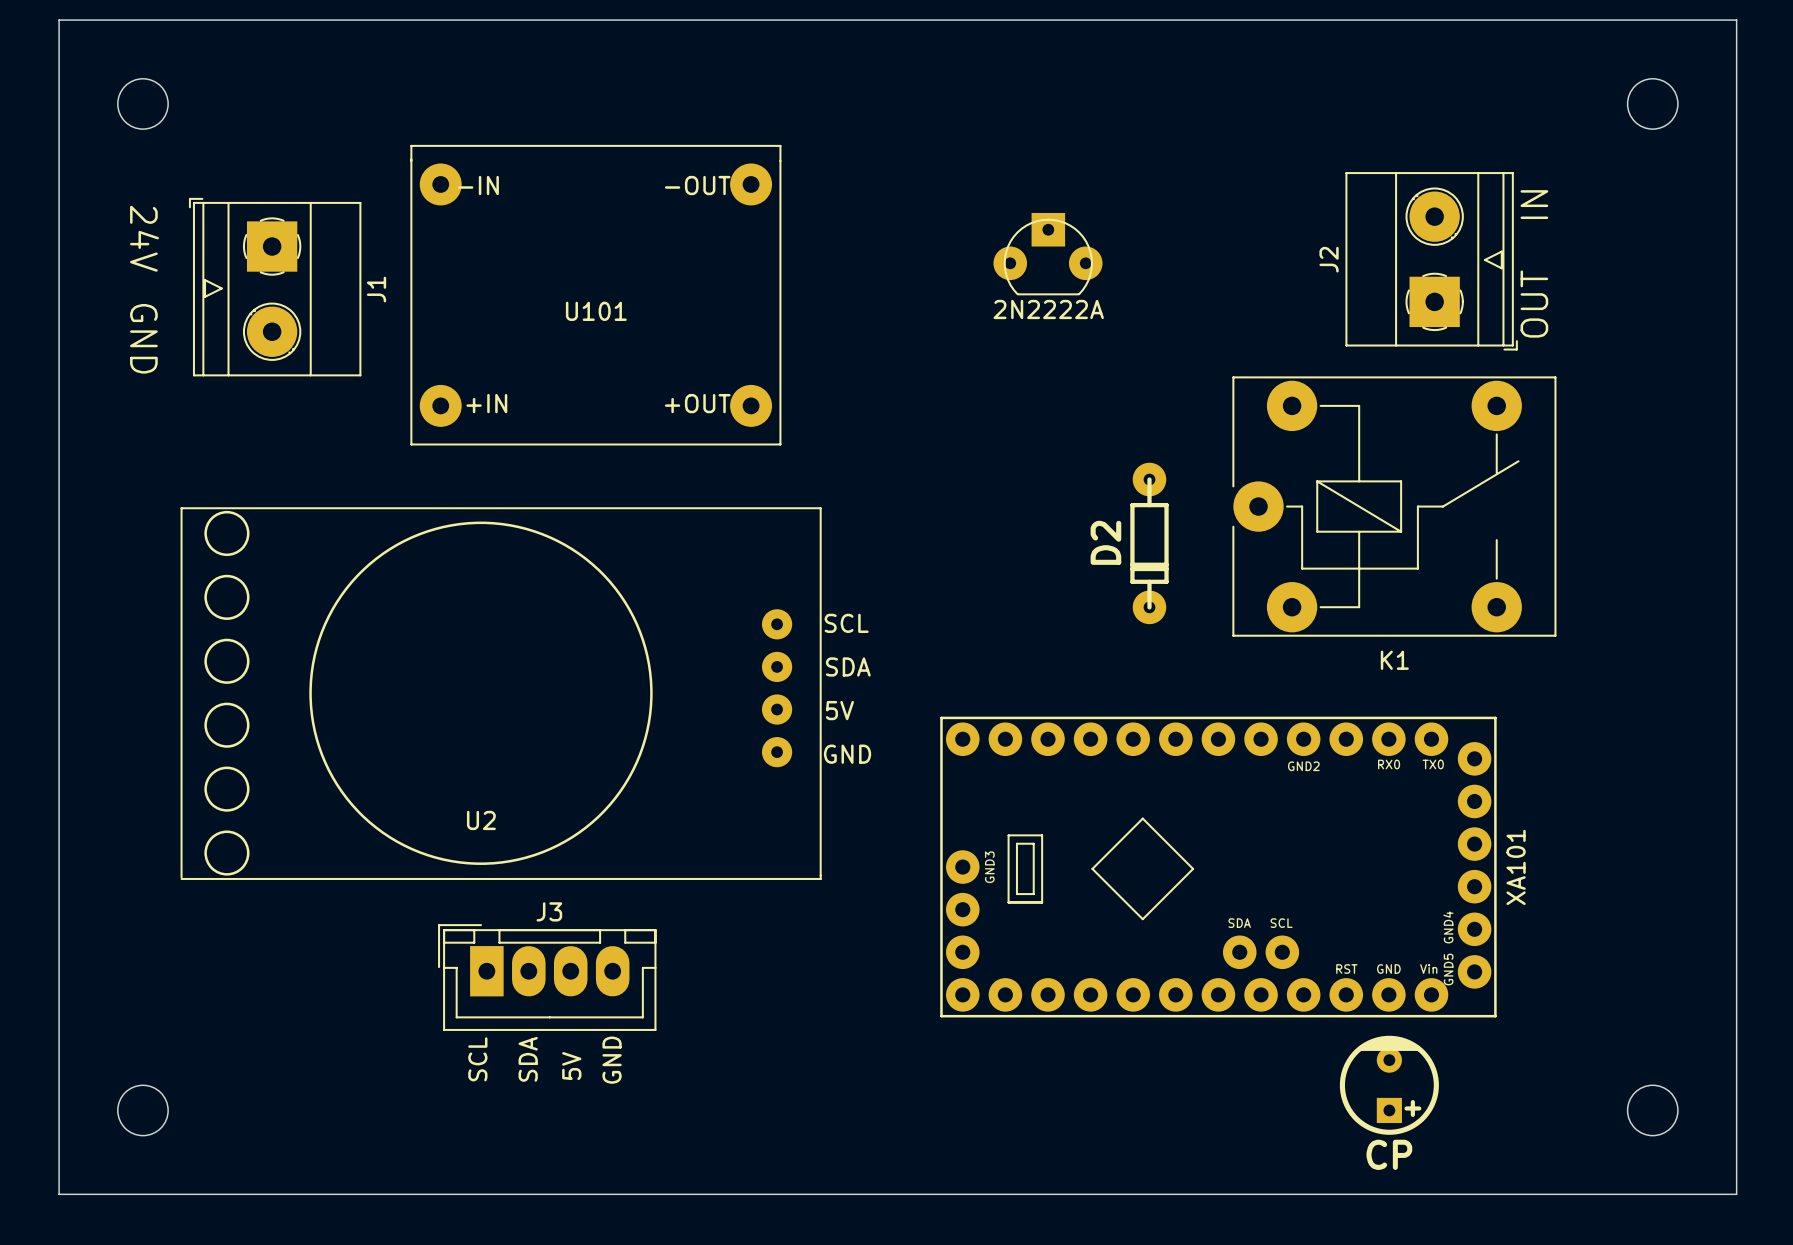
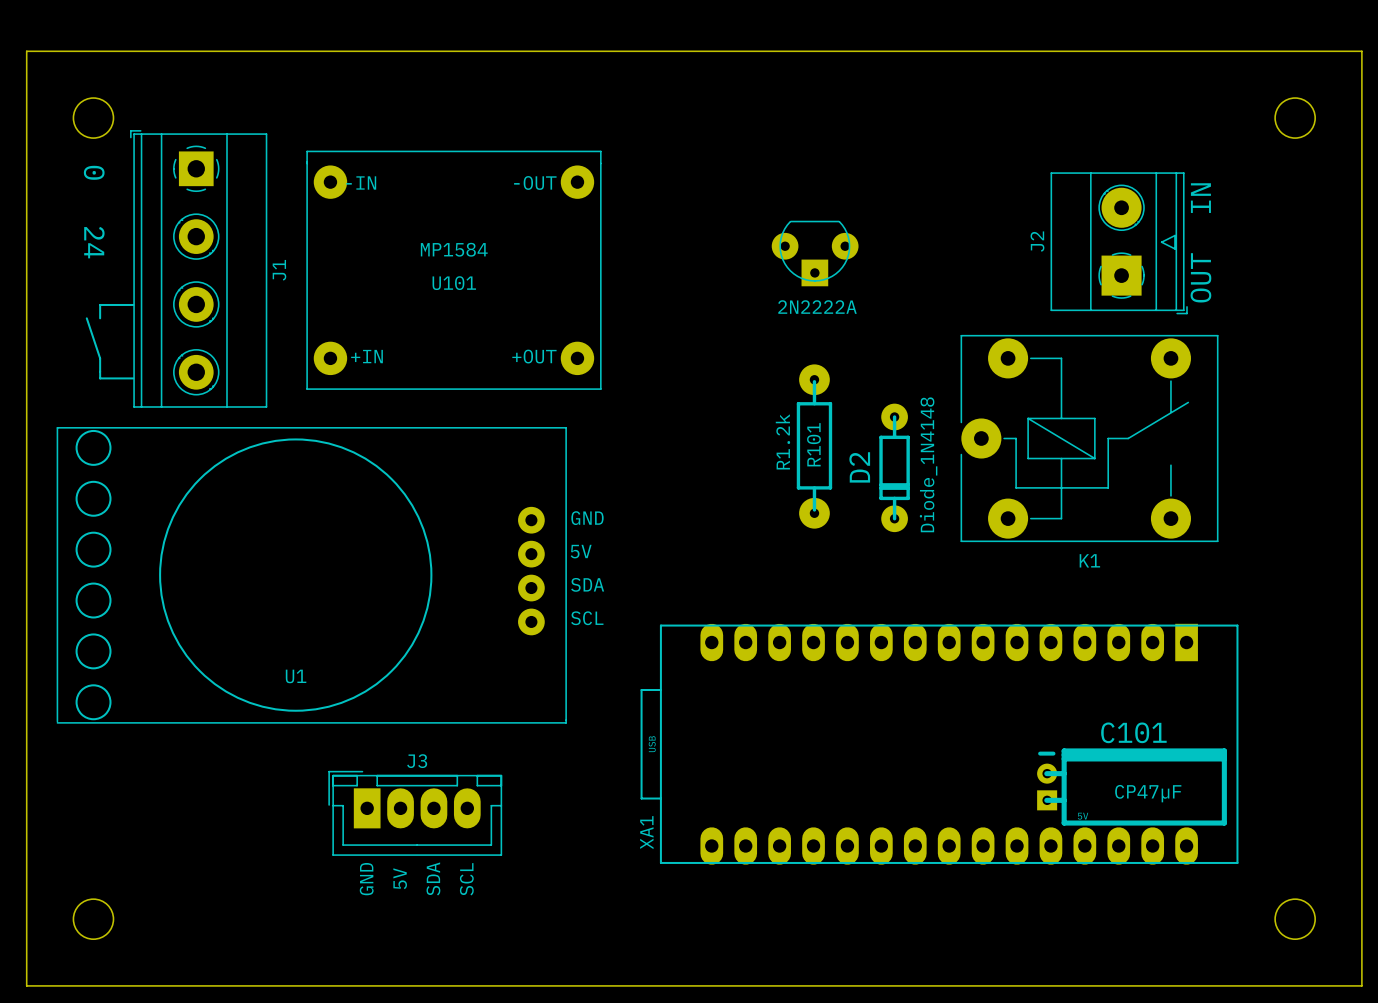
text: none -> 0 (94, 172)
J1 footprint: [188, 197, 362, 377] -> [130, 130, 268, 408]
text: 24V (144, 238) -> 24 (94, 242)
part rotation: 0° (1048, 254) -> 180° (815, 253)
U101 value: none -> MP1584 (454, 249)
text: GND (143, 338) -> none
line: none -> (133, 304) (100, 304) (100, 318)
line: none -> (86, 318) (100, 358) (100, 378) (133, 378)
R101: none -> R1.2k (814, 446)
D2 value: none -> Diode_1N4148 (928, 464)
text position: SCL (846, 623) -> SCL (587, 618)
text position: SDA (848, 666) -> SDA (587, 584)
U1: none -> (311, 575)
U2: (501, 693) -> none
text position: 5V (839, 710) -> 5V (581, 551)
text position: GND (847, 754) -> GND (587, 518)
XA101: (1218, 867) -> none
XA1: none -> (939, 744)
C101: none -> CP47µF (1132, 786)
text: SCL (477, 1059) -> GND (366, 879)
text: SDA (528, 1059) -> 5V (400, 878)
text: GND (612, 1060) -> SCL (466, 879)
text: 5V (571, 1066) -> SDA (433, 878)
part: CP (1389, 1085) -> none

